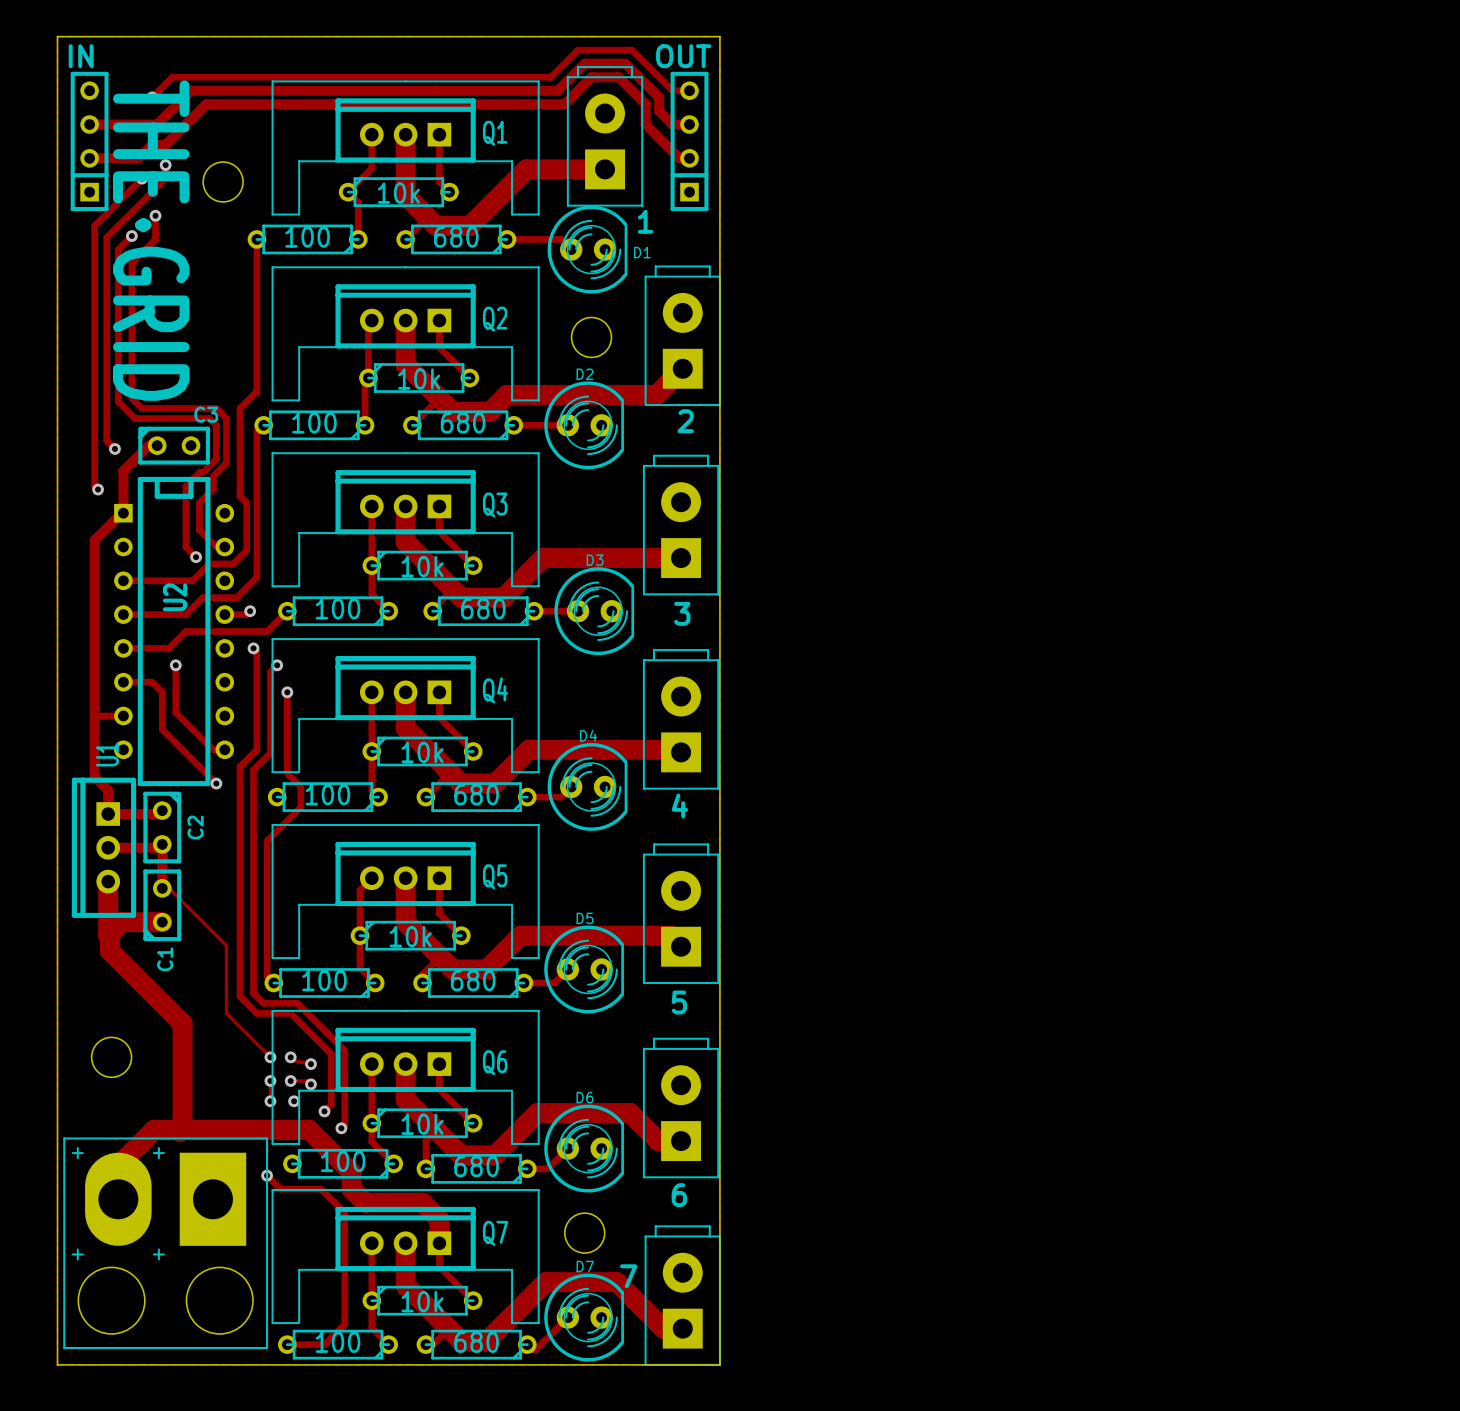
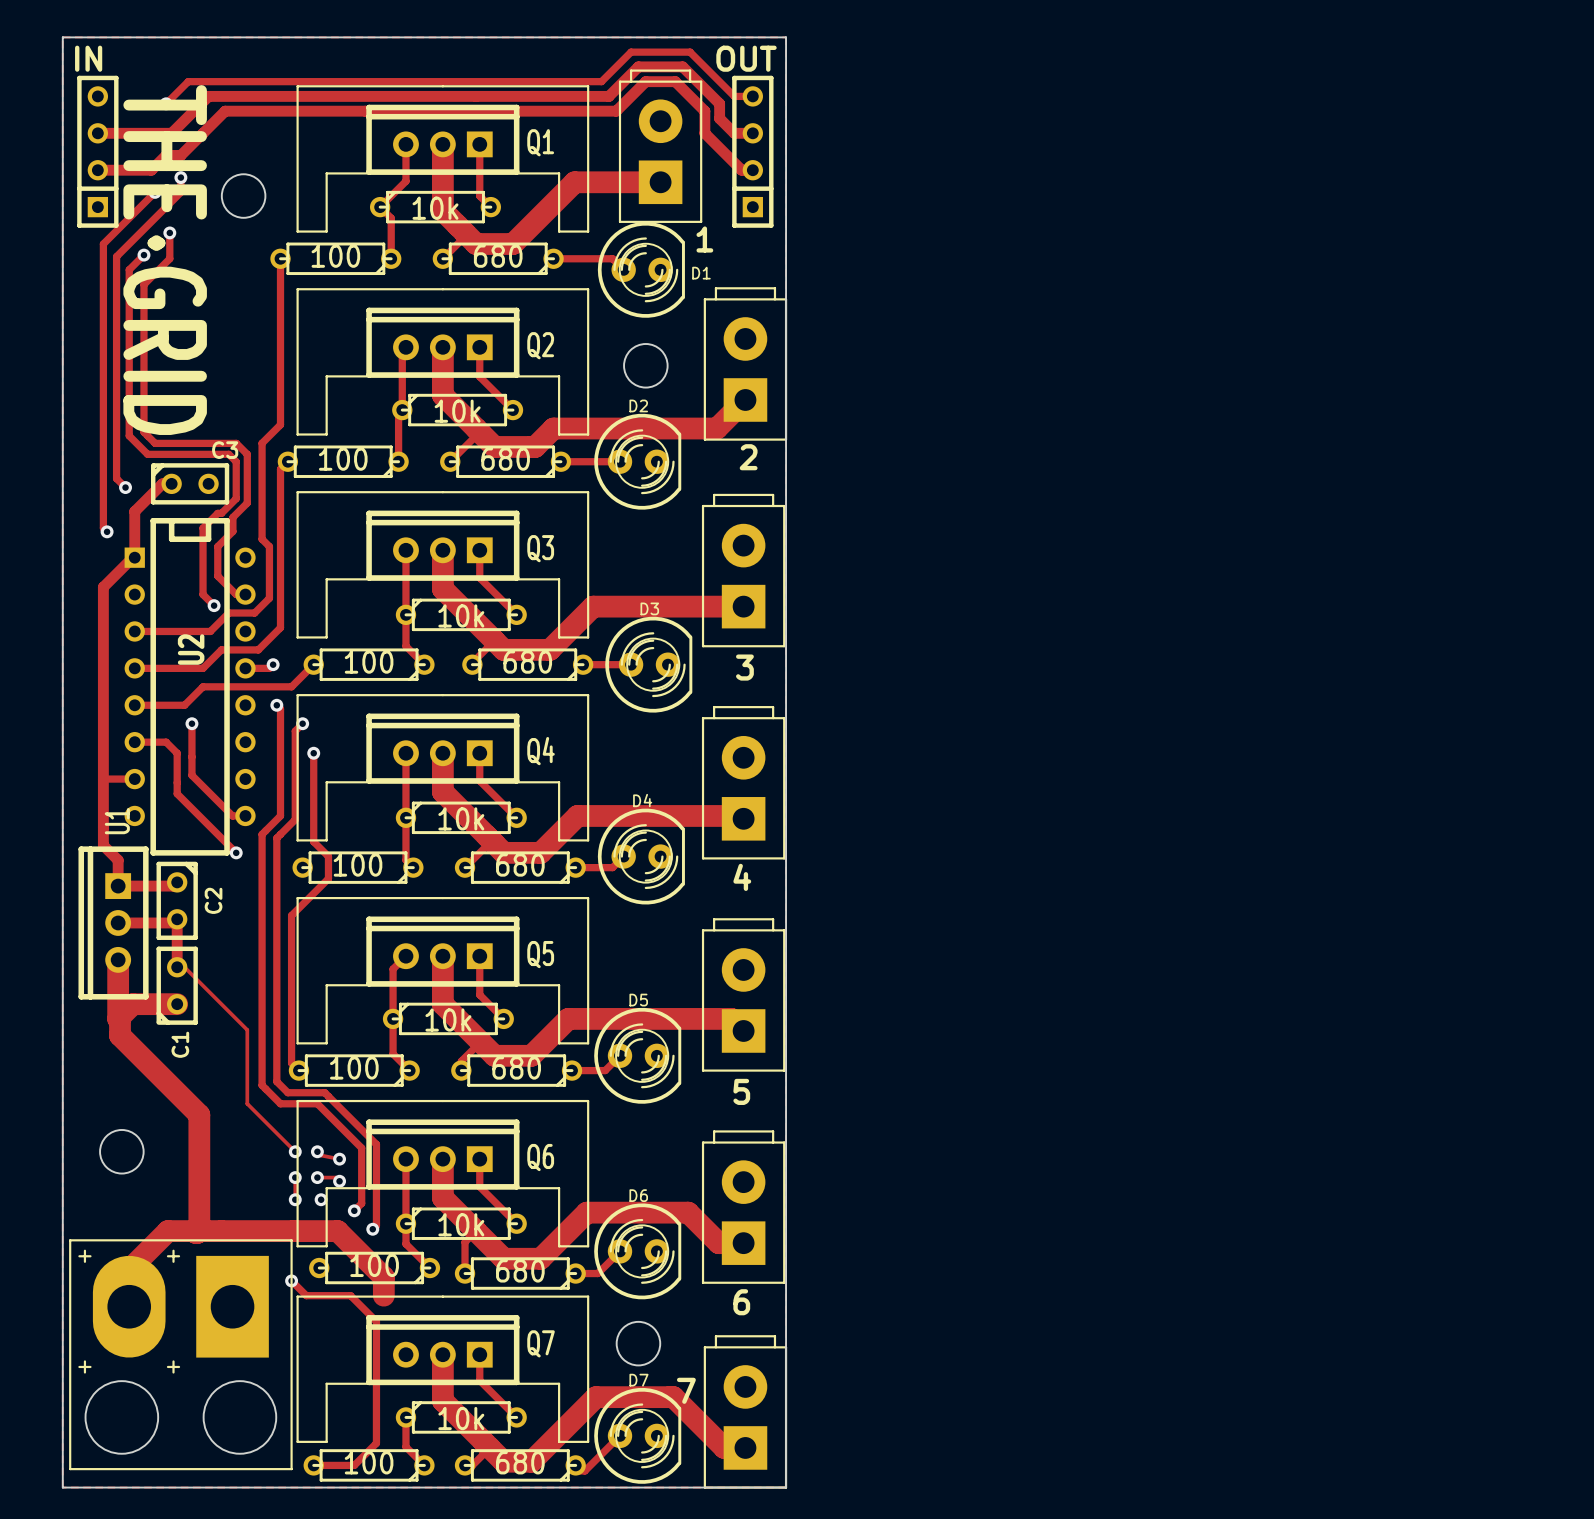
track: (351, 1189) (365, 1202) (422, 1202) (439, 1219) (439, 1243) -> none
track: (371, 1243) (371, 1300) -> none

